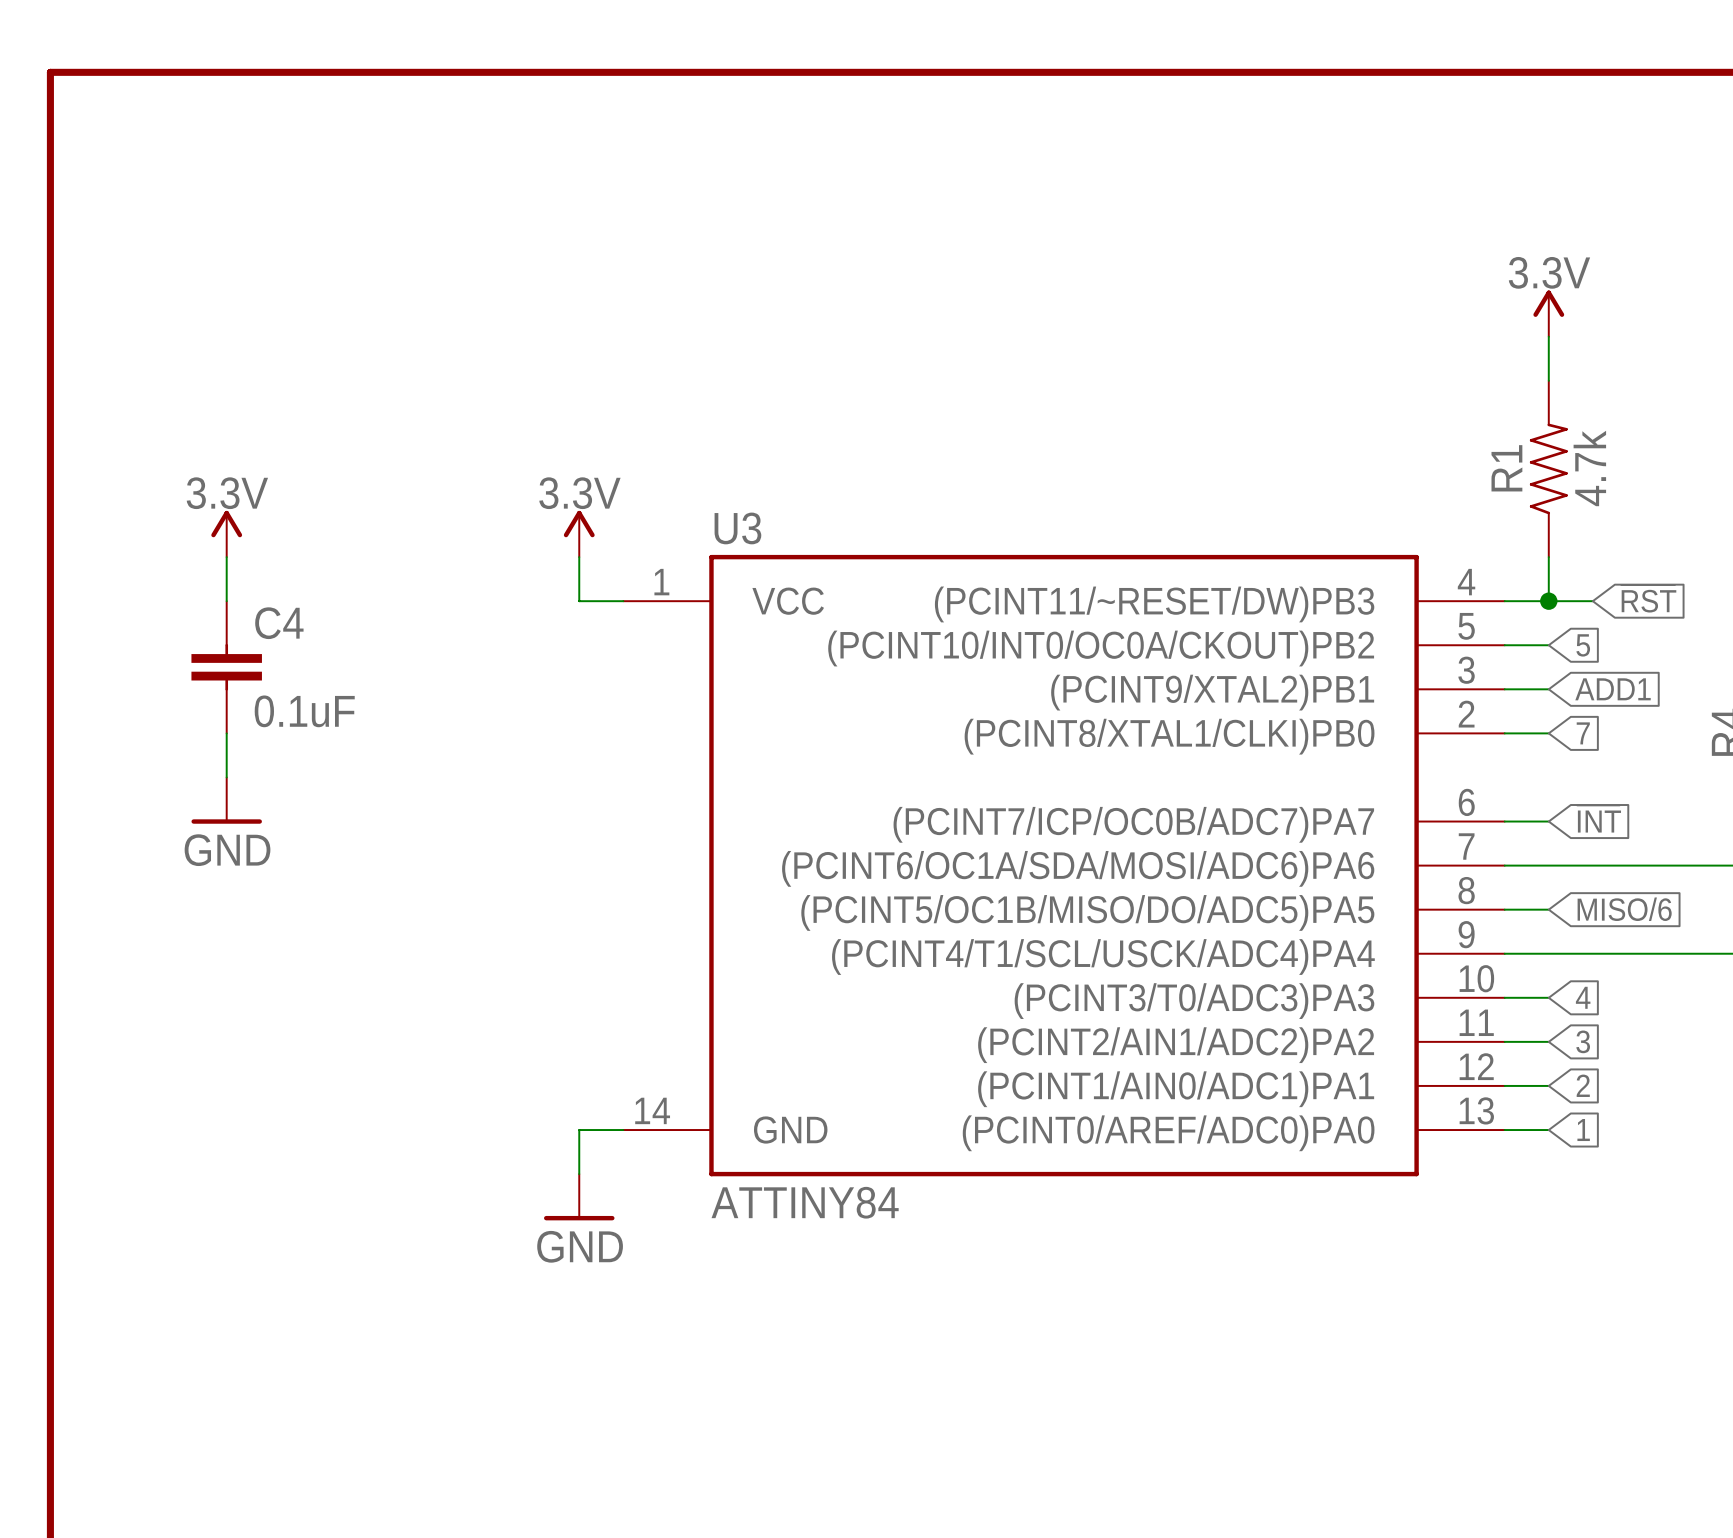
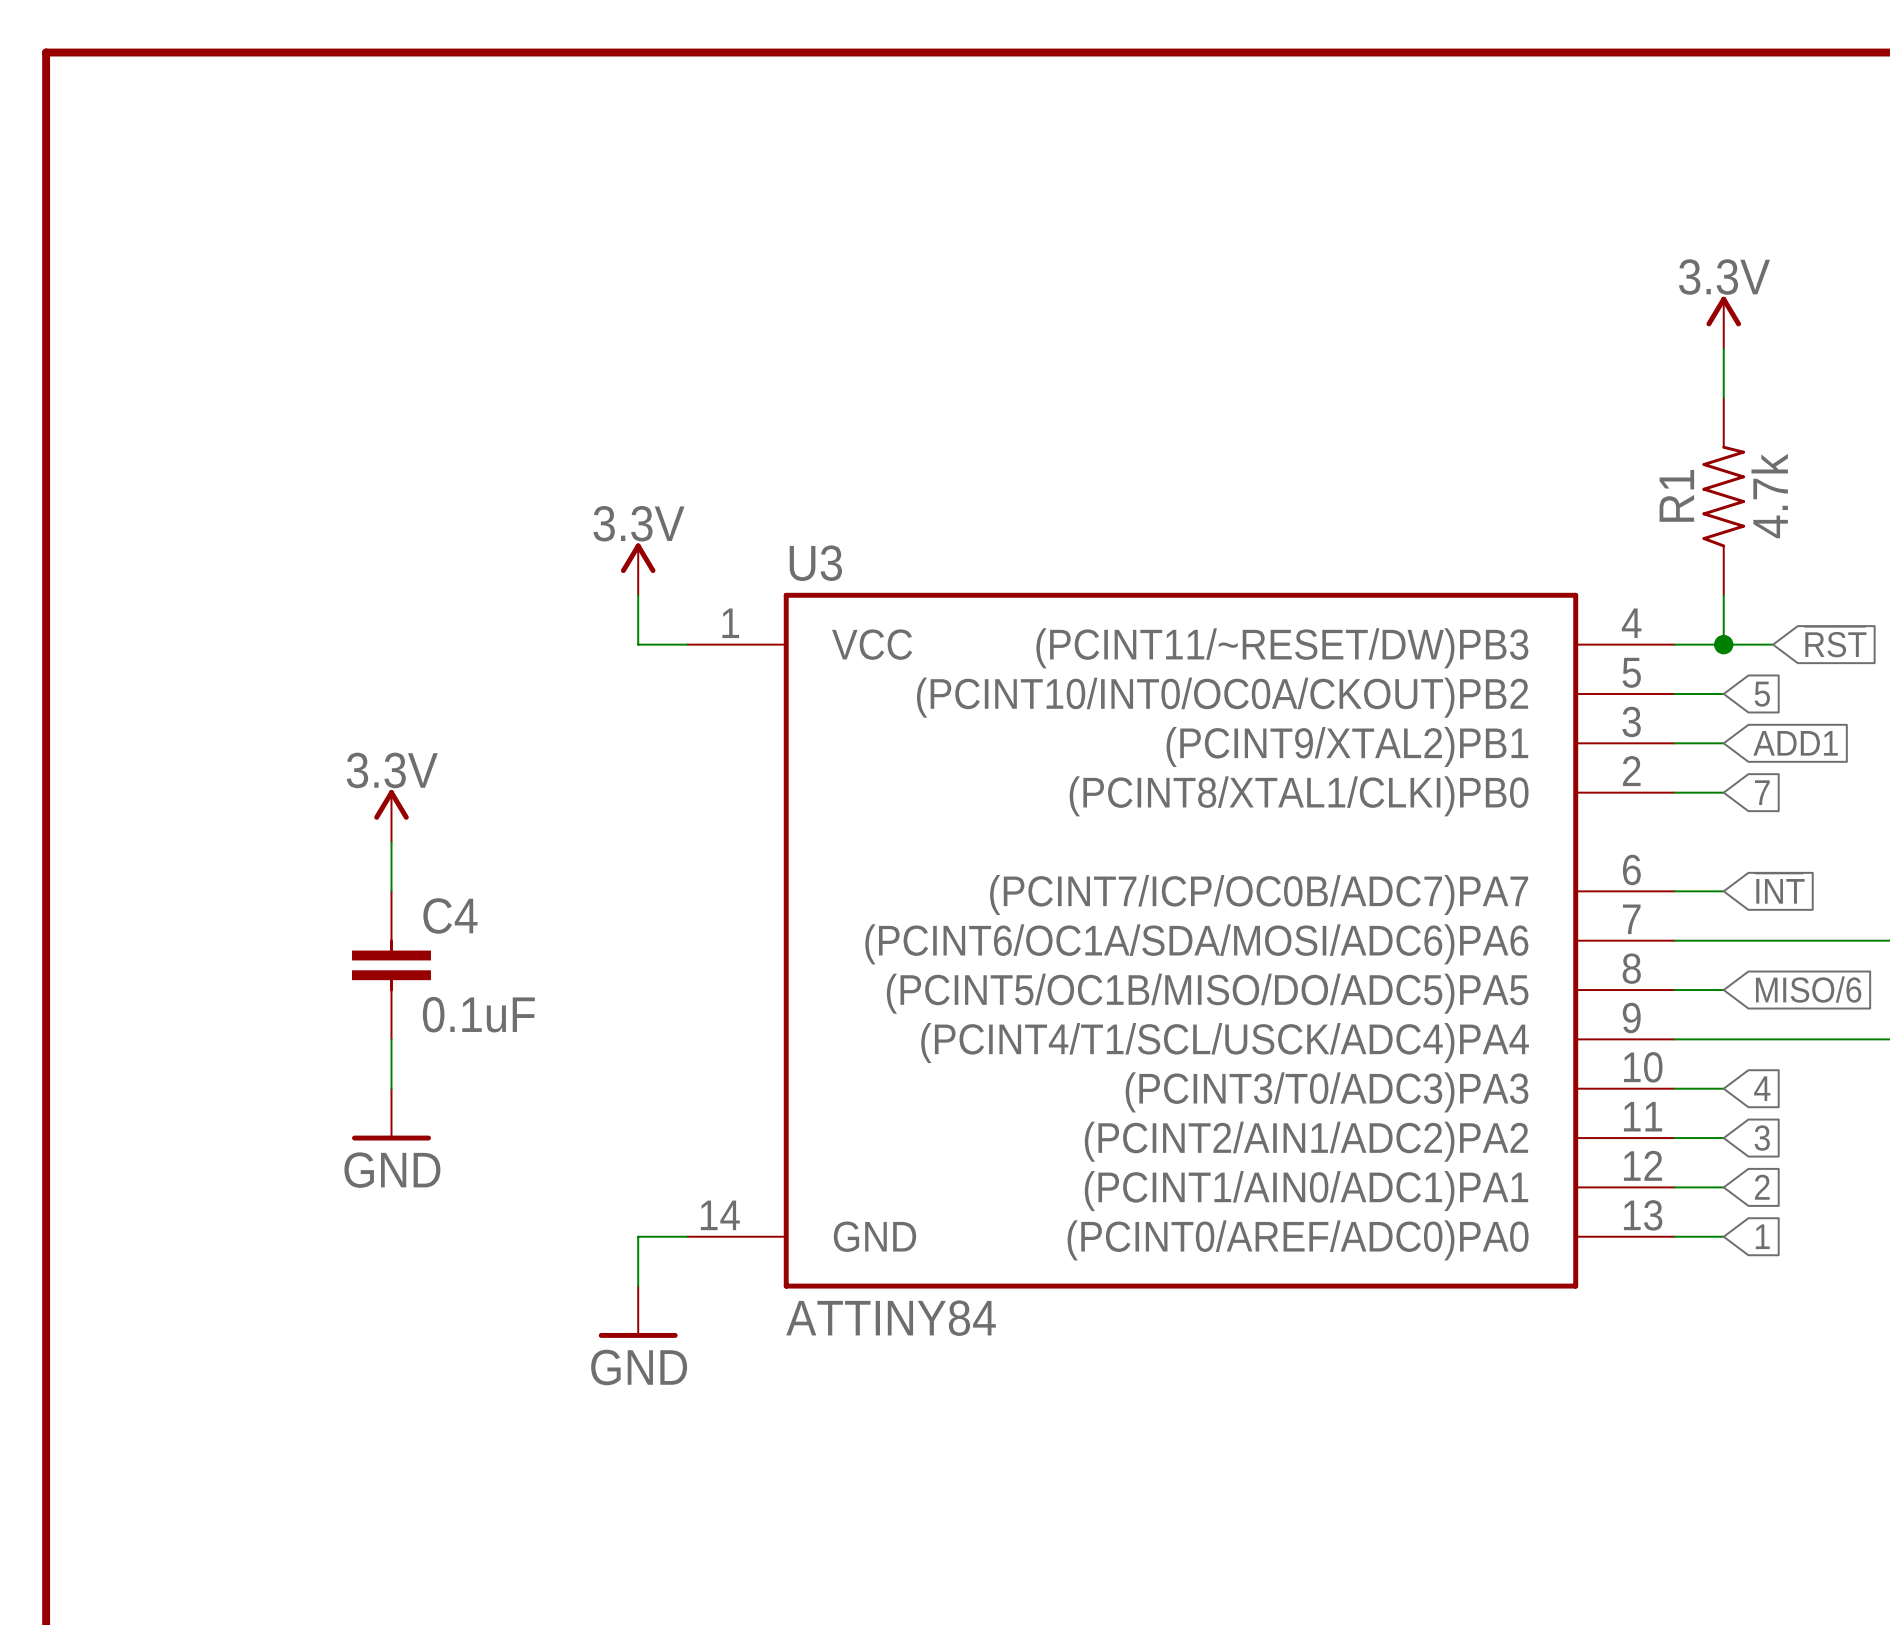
power symbol position: 3.3V (226, 533) -> 3.3V (391, 816)
wire: (226, 557) (226, 601) -> (391, 1039) (391, 1088)
C4 position: (226, 667) -> (391, 965)
wire: (226, 733) (226, 777) -> (391, 842) (391, 891)
power symbol position: GND (226, 800) -> GND (391, 1114)

